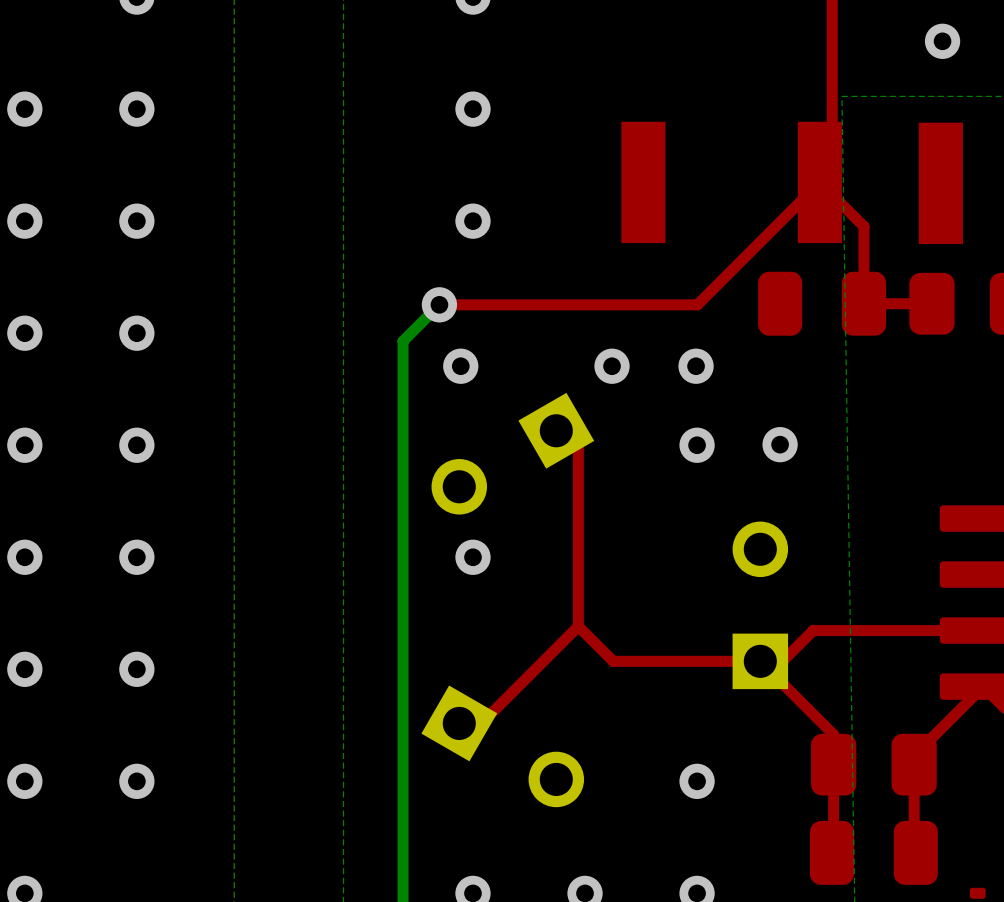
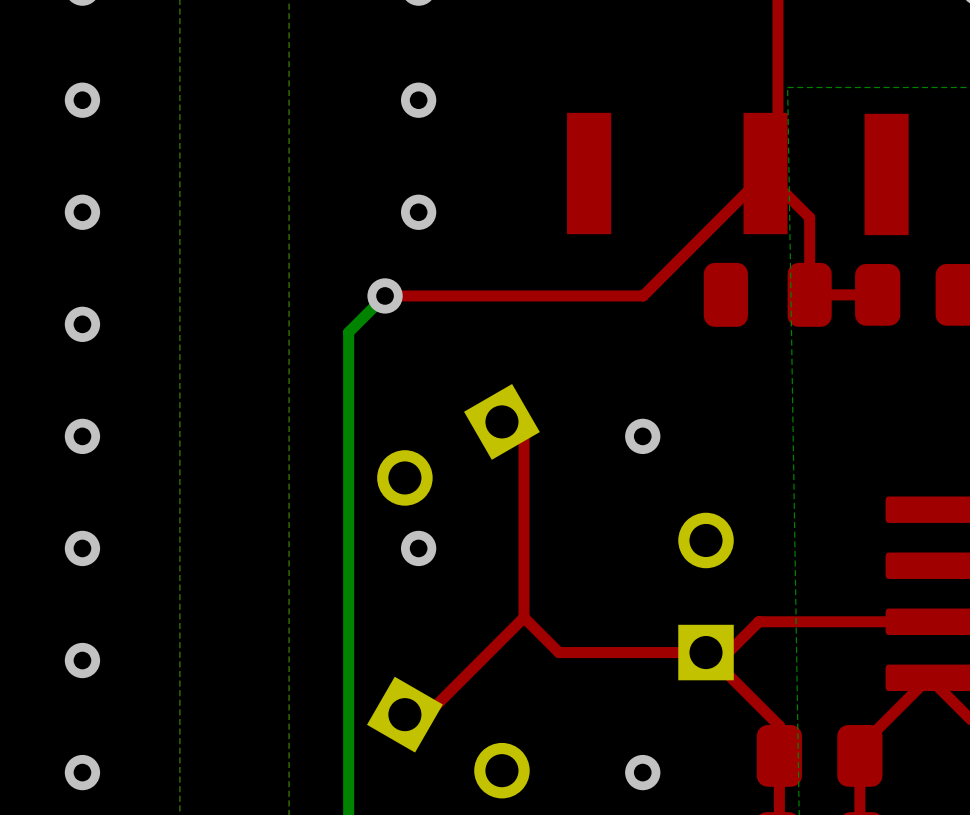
via: (942, 41) -> none
via: (460, 366) -> none
via: (612, 366) -> none
via: (696, 366) -> none
via: (780, 444) -> none

